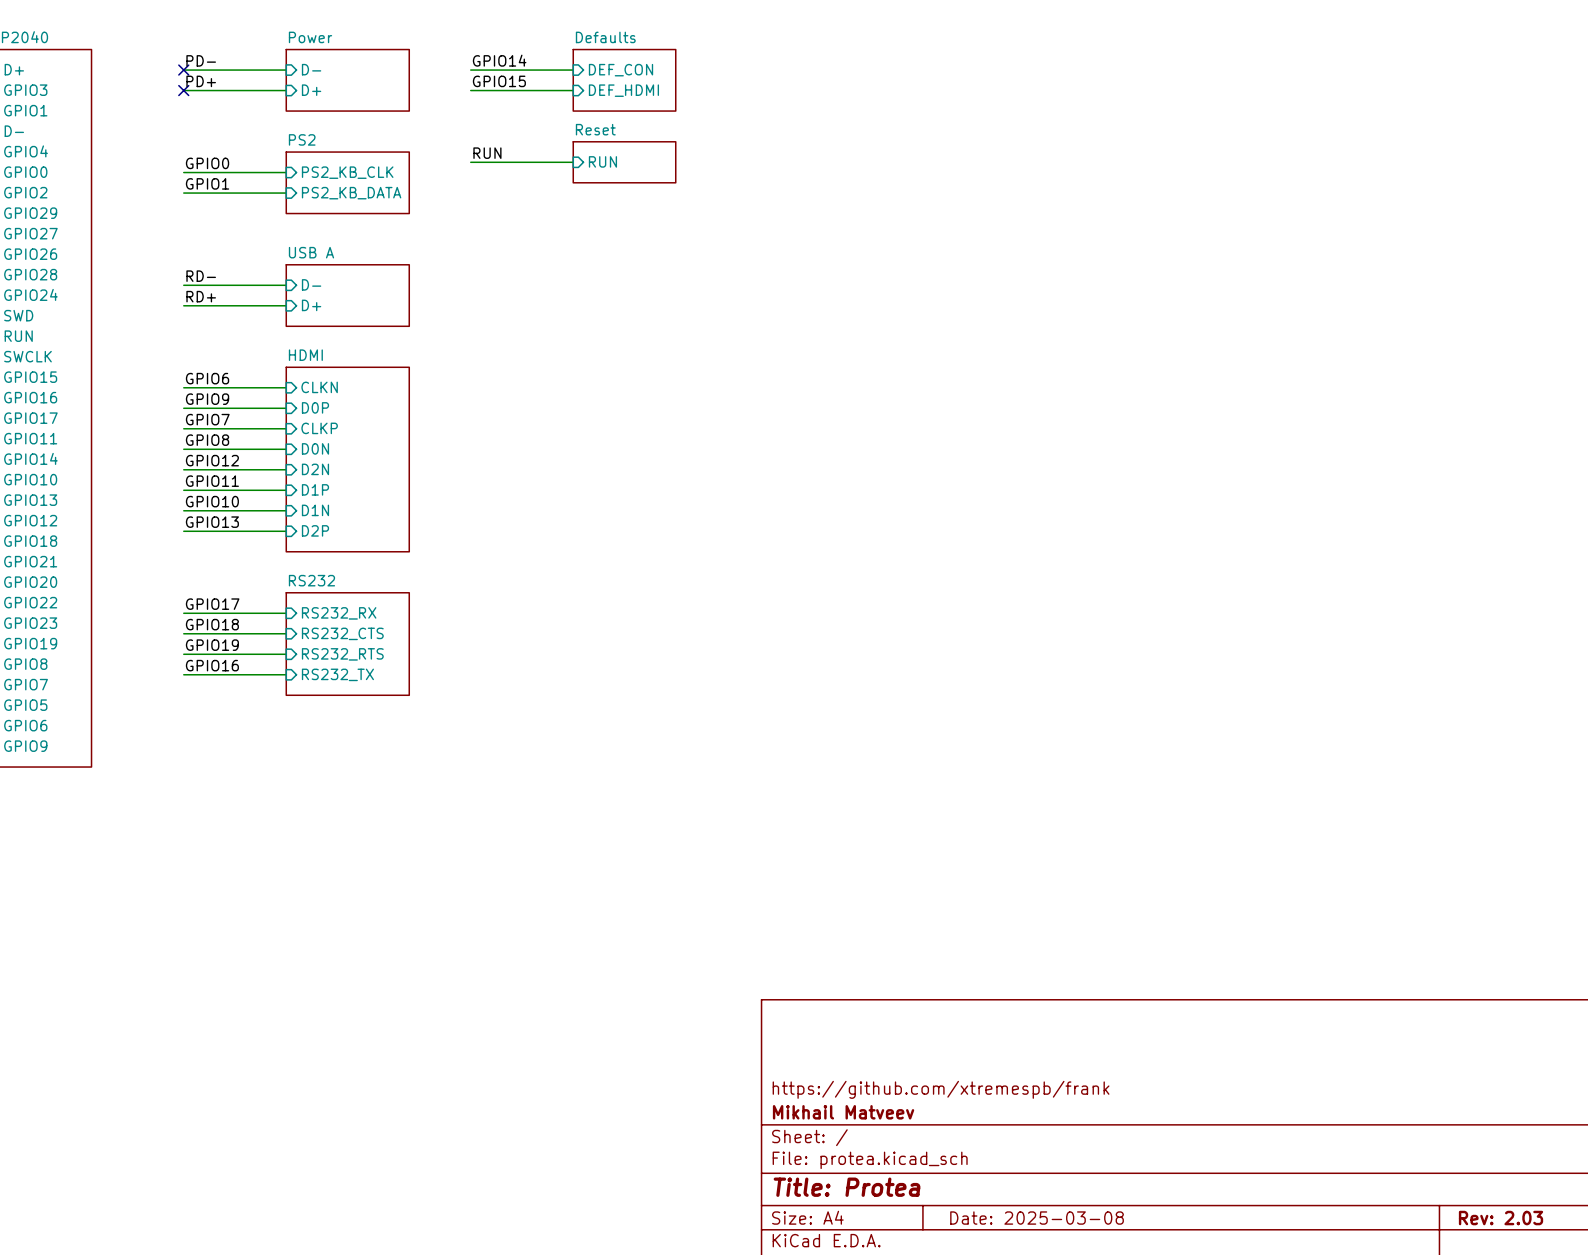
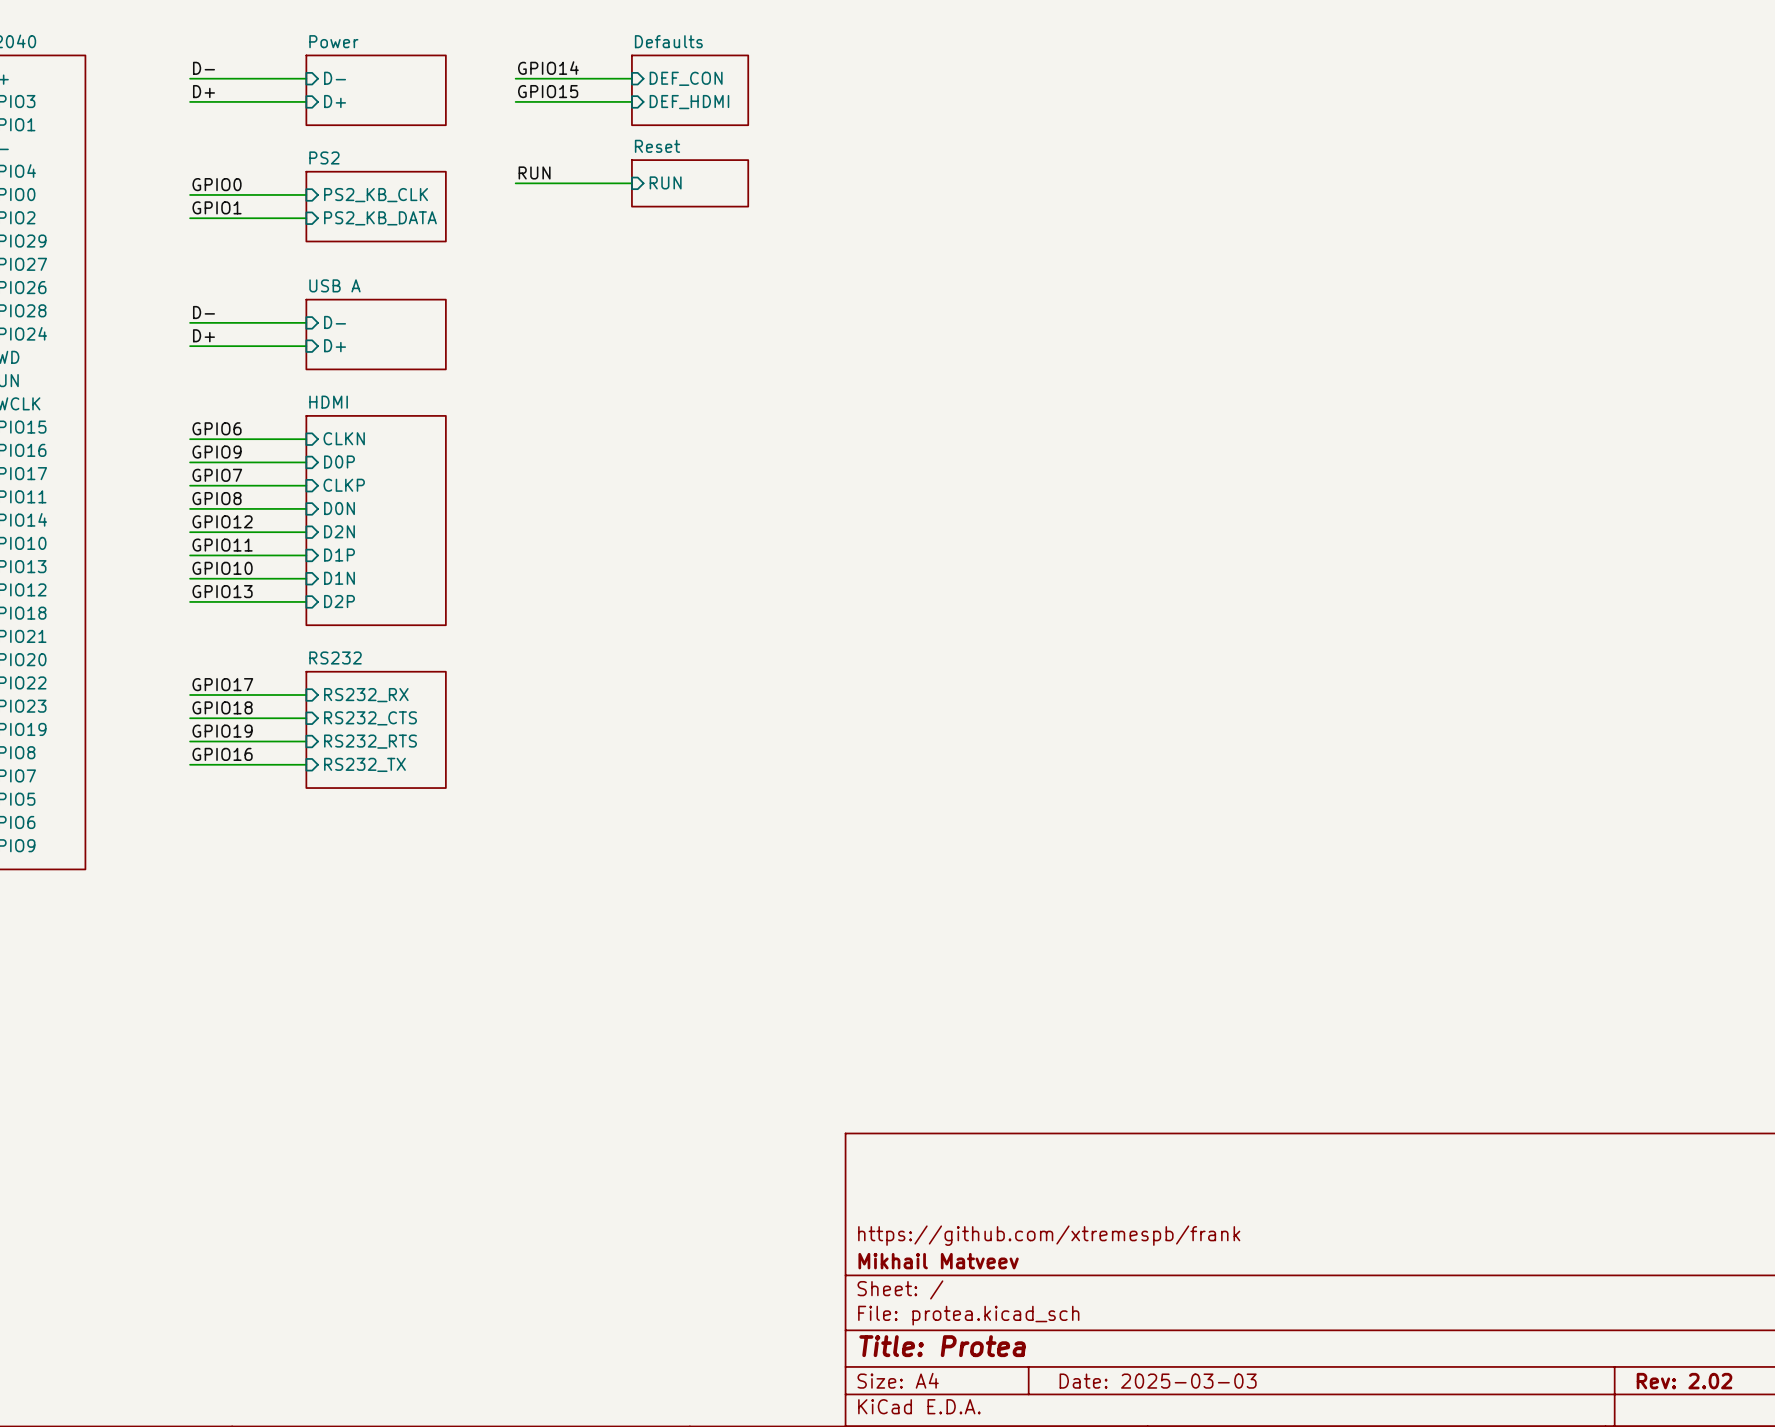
label: PD- (201, 60) -> D- (204, 68)
no-connect mark: (183, 70) -> none
label: PD+ (201, 81) -> D+ (204, 91)
no-connect mark: (183, 90) -> none
label: RD- (201, 276) -> D- (204, 312)
label: RD+ (201, 296) -> D+ (204, 335)
title block: Date: 2025-03-08 (1037, 1218) -> Date: 2025-03-03 (1158, 1381)
title block: Rev: 2.03 (1501, 1218) -> Rev: 2.02 (1684, 1381)

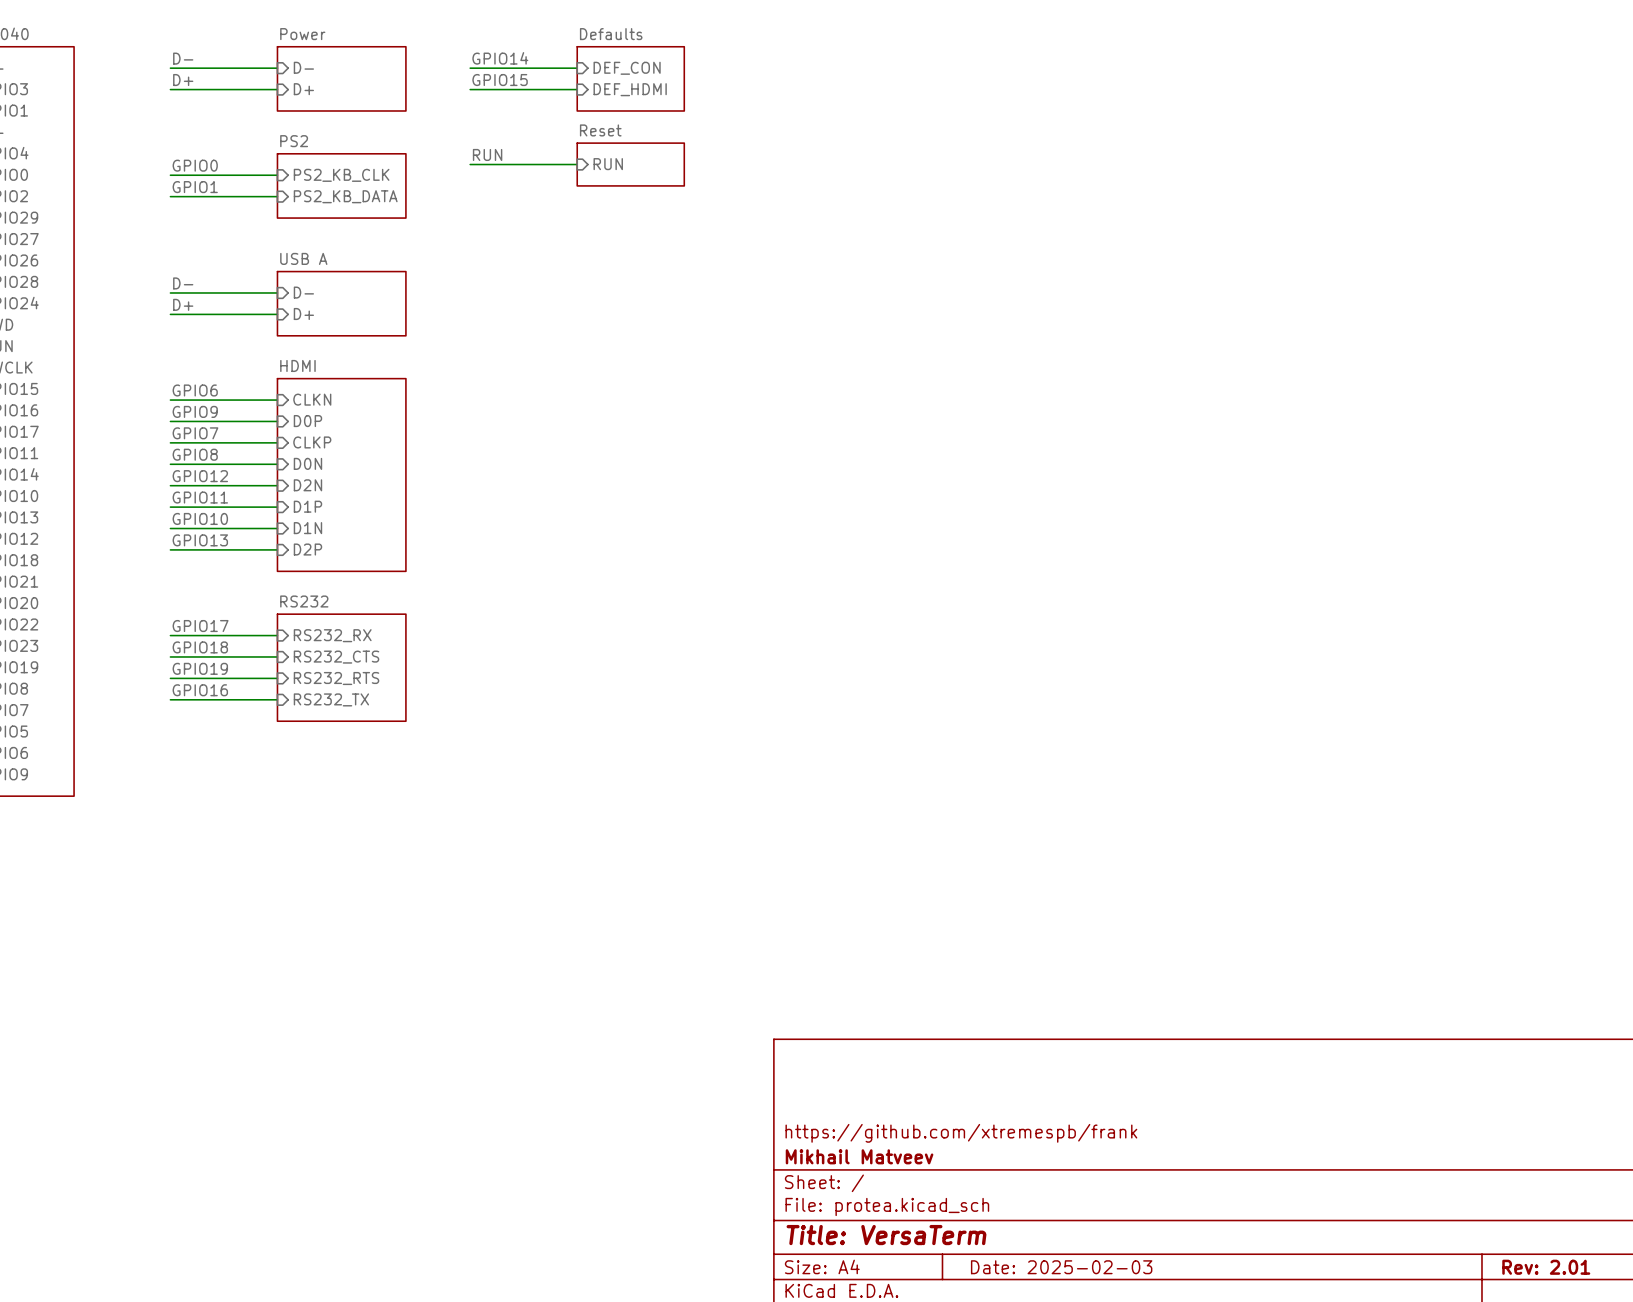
title block: Title: Protea (942, 1346) -> Title: VersaTerm (886, 1235)
title block: Date: 2025-03-03 (1158, 1381) -> Date: 2025-02-03 (1061, 1267)
title block: Rev: 2.02 (1684, 1381) -> Rev: 2.01 (1546, 1267)

